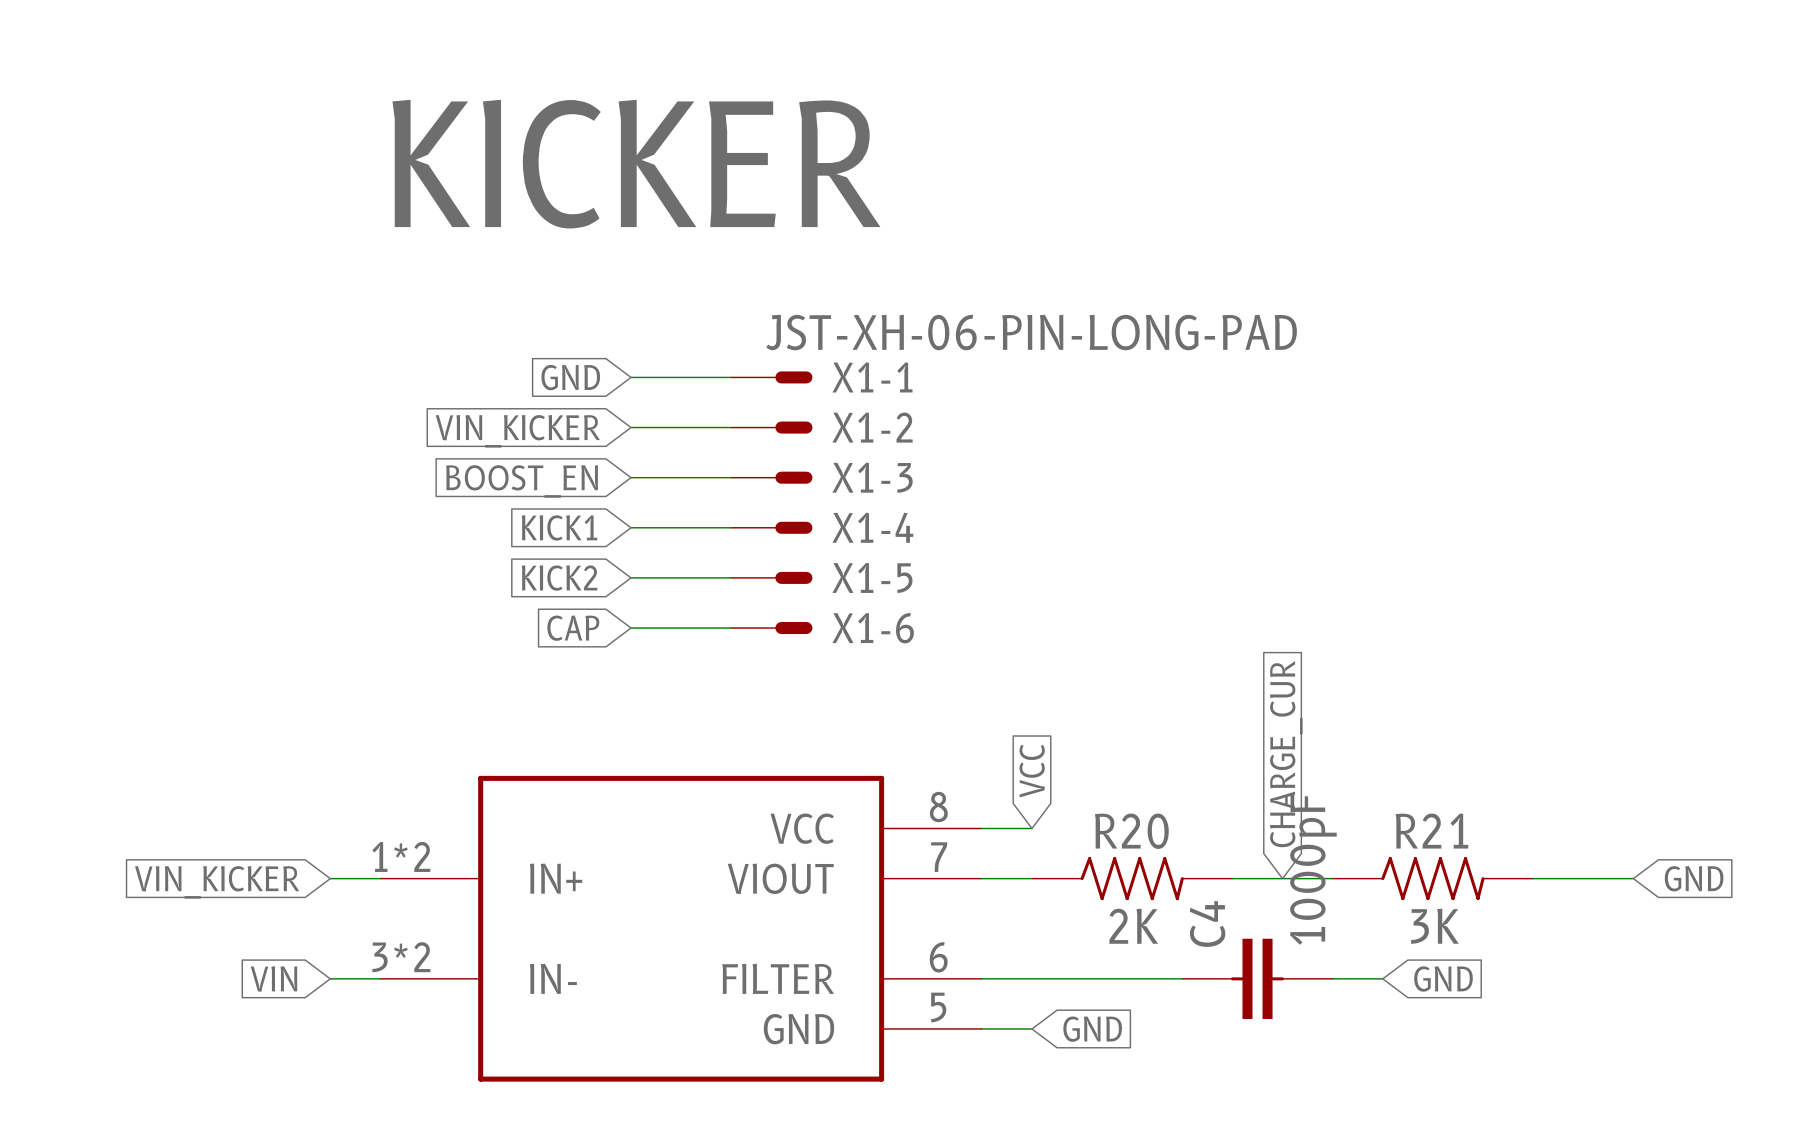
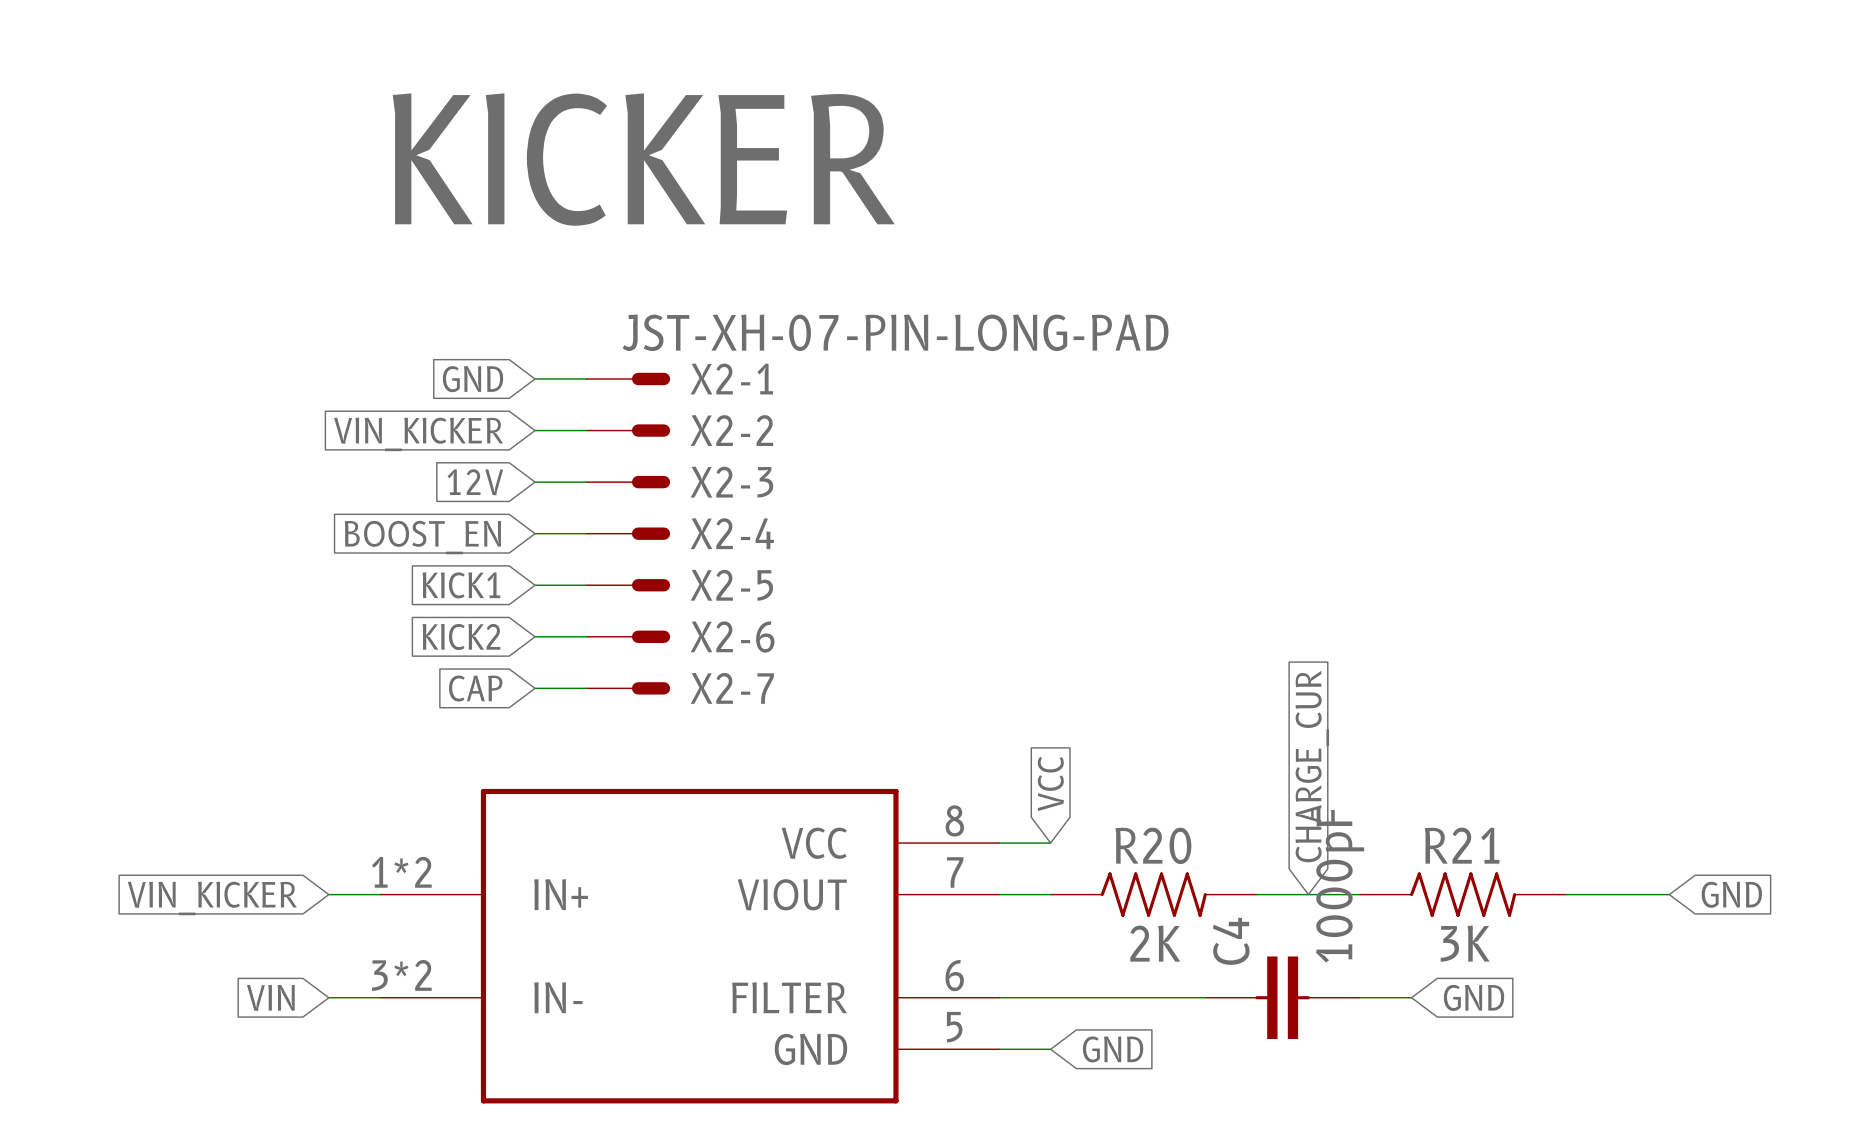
wire: none -> (535, 378) (586, 378)
global label position: GND (570, 377) -> GND (473, 379)
X2-1: none -> JST-XH-07-PIN-LONG-PAD (628, 378)
wire: (631, 377) (731, 377) -> none
X1-1: JST-XH-06-PIN-LONG-PAD (771, 377) -> none
wire: none -> (535, 430) (586, 430)
X2-2: none -> (628, 430)
wire: (631, 427) (731, 427) -> none
X1-2: (771, 427) -> none
global label position: VIN_KICKER (517, 431) -> VIN_KICKER (418, 434)
global label: none -> 12V (475, 482)
wire: none -> (535, 482) (586, 482)
X2-3: none -> (628, 482)
wire: (631, 477) (731, 477) -> none
X1-3: (771, 477) -> none
global label position: BOOST_EN (521, 481) -> BOOST_EN (422, 537)
wire: none -> (535, 533) (586, 533)
global label position: KICK1 (559, 527) -> KICK1 (461, 585)
X2-4: none -> (628, 533)
wire: (631, 527) (731, 527) -> none
X1-4: (771, 527) -> none
wire: none -> (535, 585) (586, 585)
X2-5: none -> (628, 585)
wire: (631, 577) (731, 577) -> none
X1-5: (771, 577) -> none
global label position: KICK2 (559, 578) -> KICK2 (461, 636)
wire: none -> (535, 636) (586, 636)
global label position: CAP (573, 628) -> CAP (475, 688)
X2-6: none -> (628, 636)
wire: (631, 628) (731, 628) -> none
X1-6: (771, 628) -> none
wire: none -> (535, 688) (586, 688)
X2-7: none -> (628, 688)

